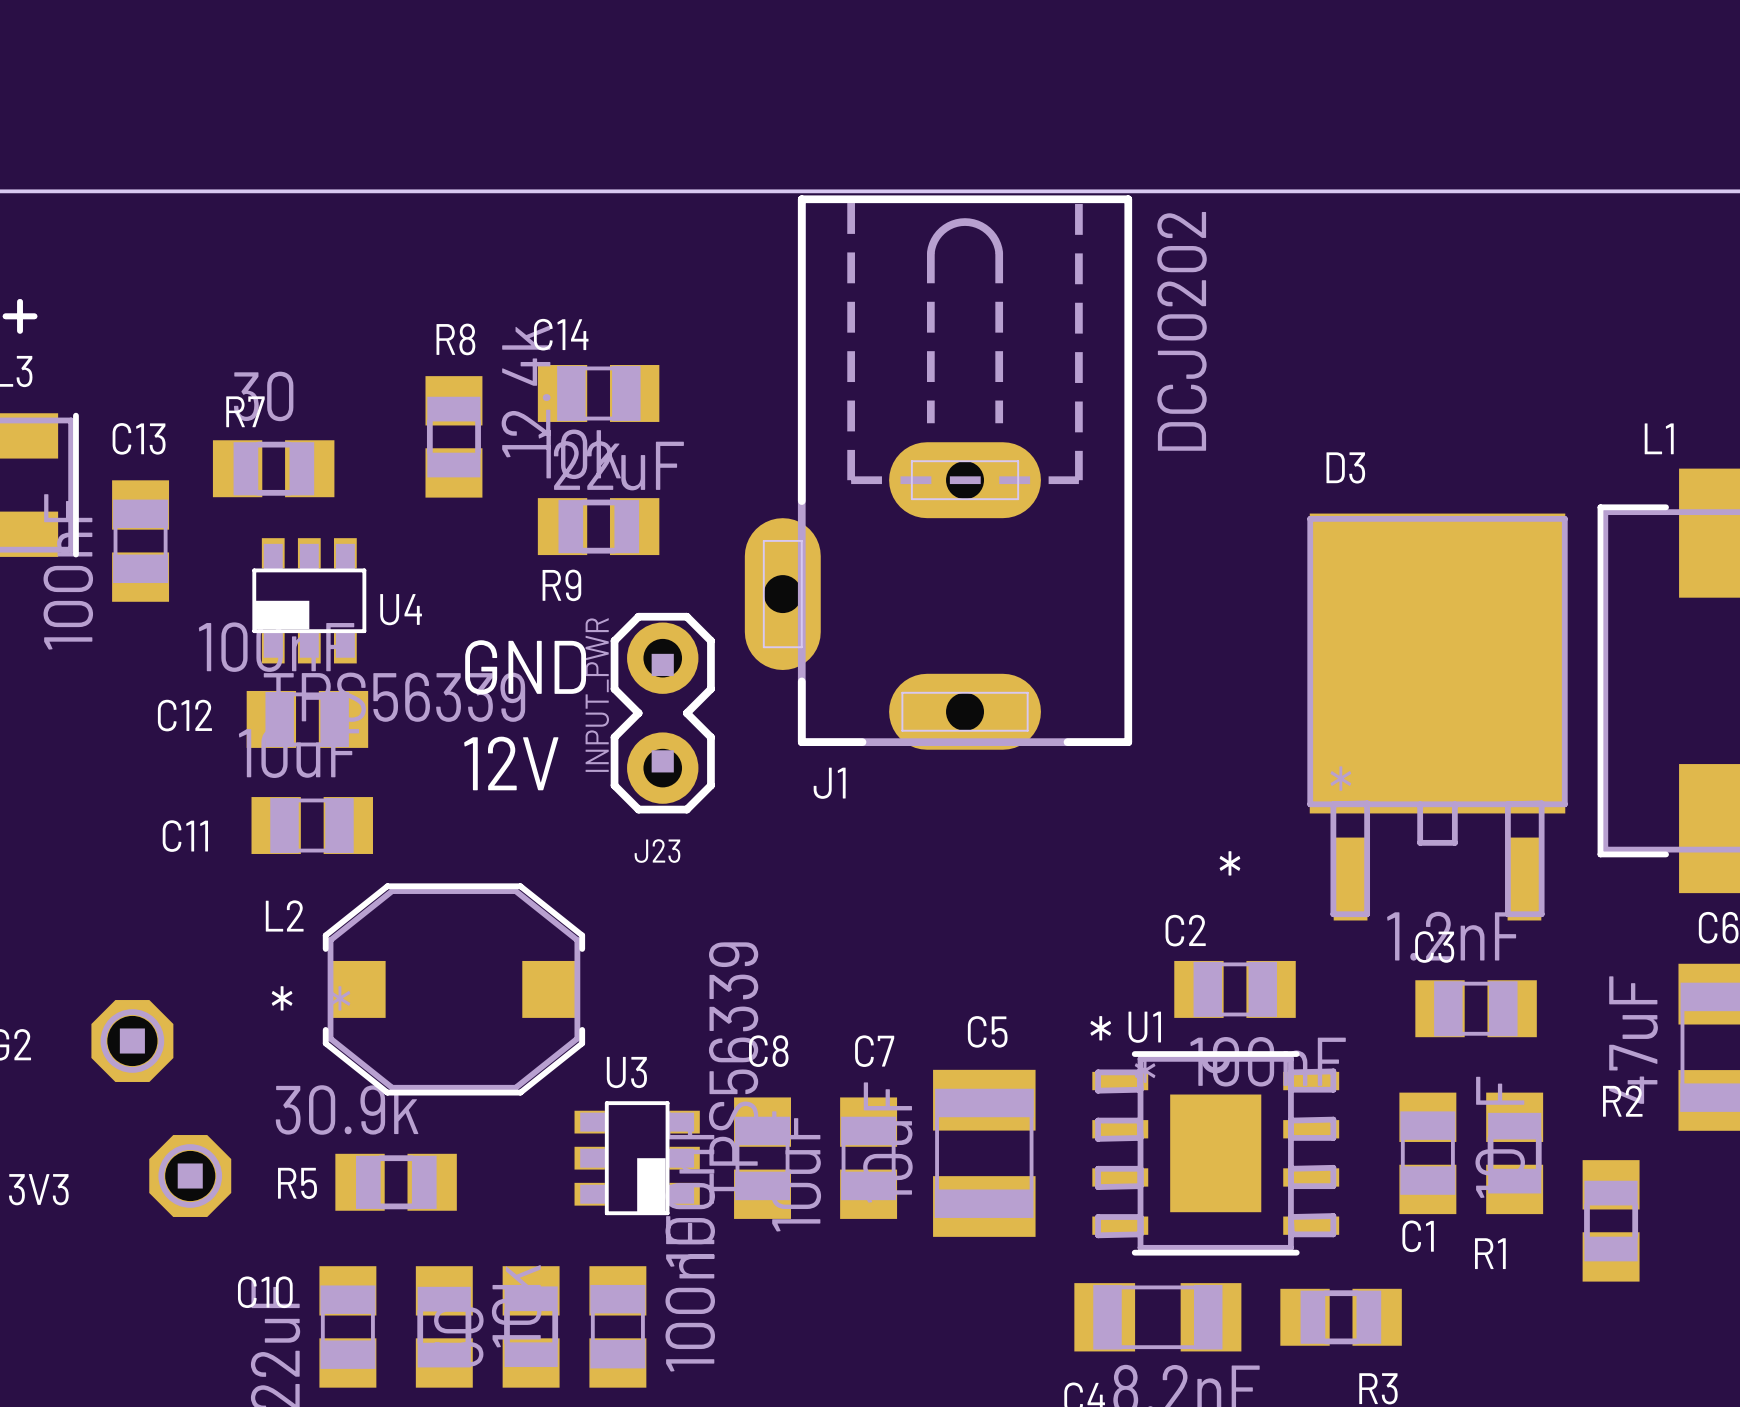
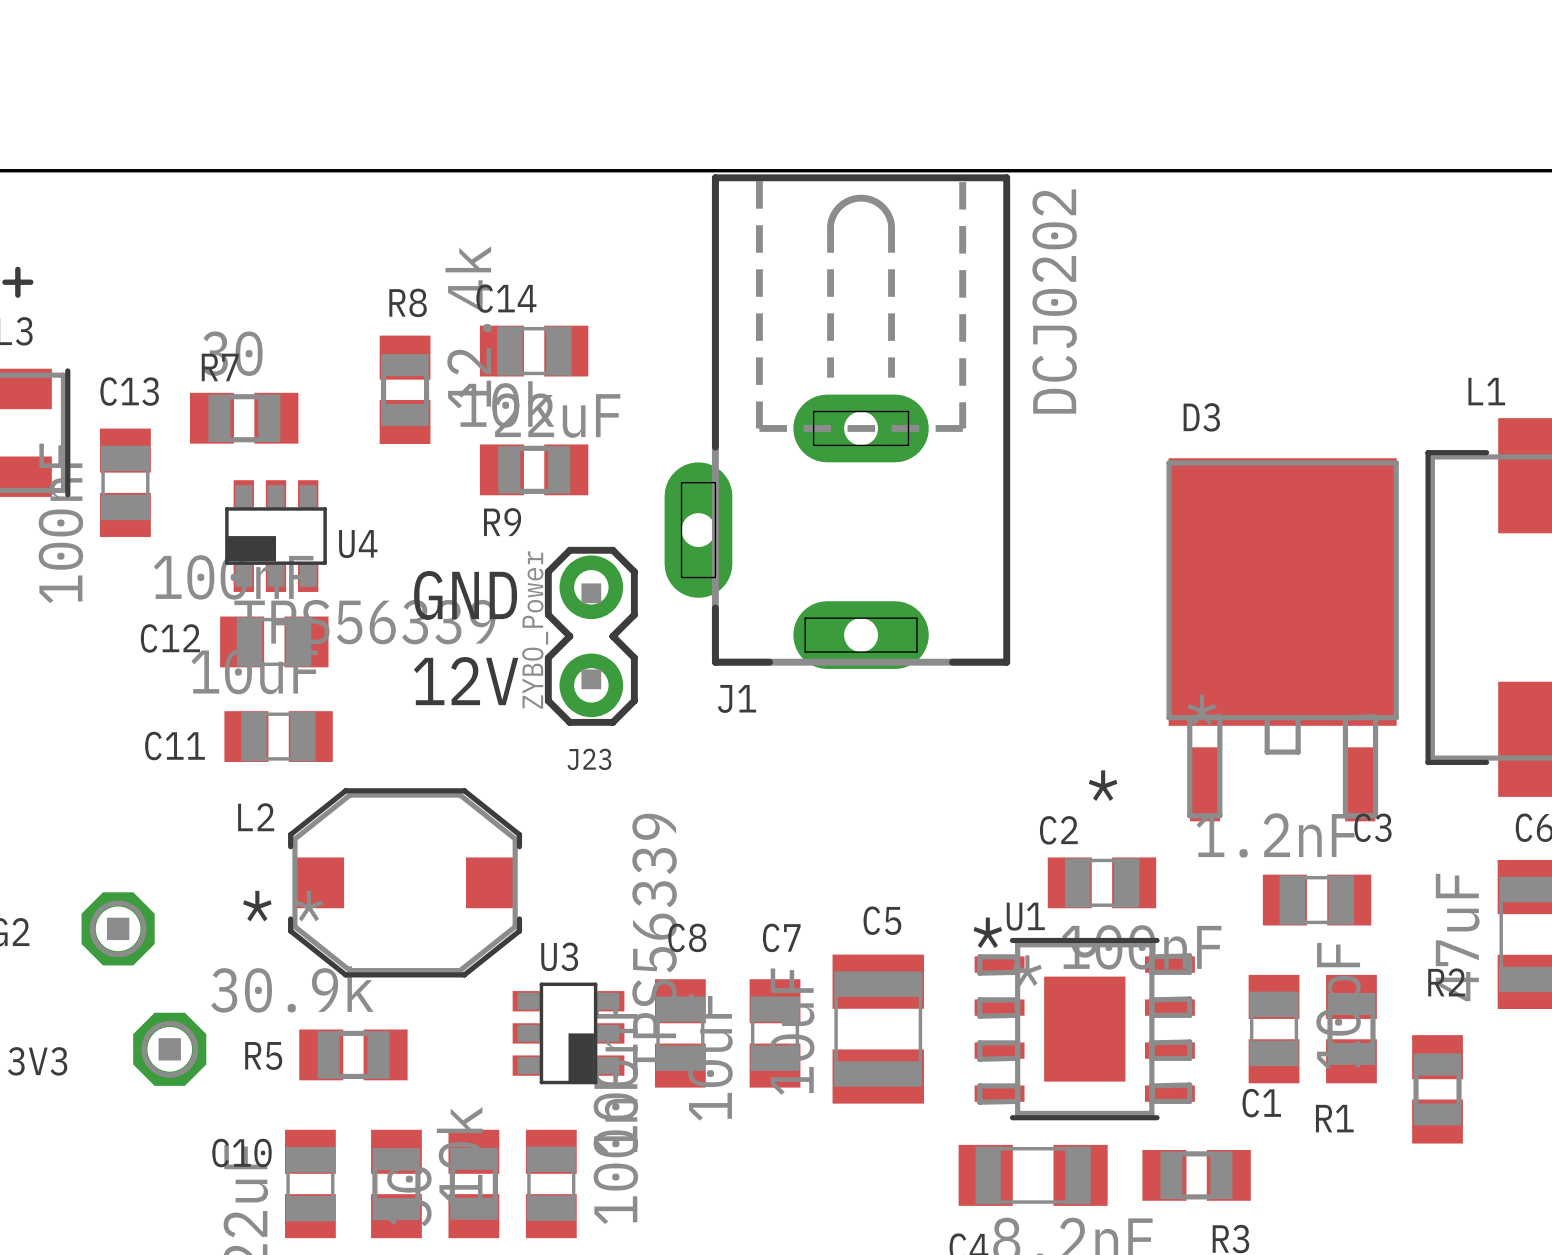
J23 value: INPUT_PWR (597, 695) -> ZYBO_Power (535, 630)
C3 name position: C3 (1434, 947) -> C3 (1372, 827)

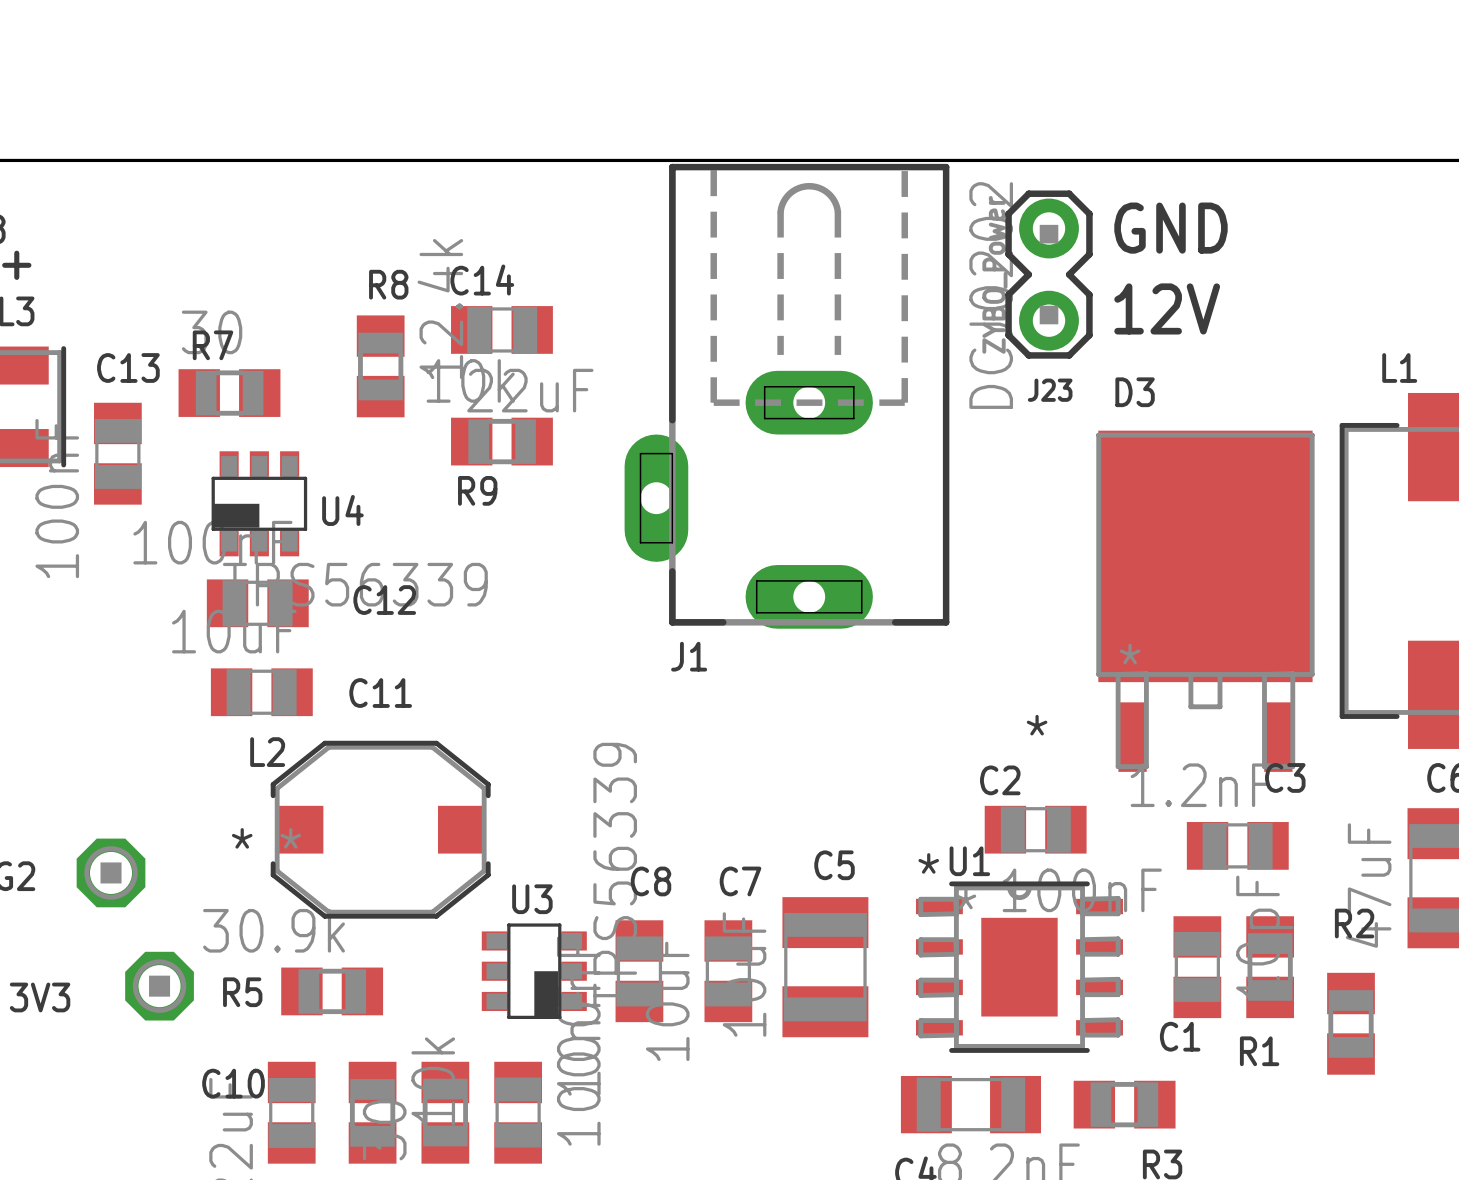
text position: GND (465, 595) -> GND (1170, 228)
J23 position: (591, 636) -> (1049, 274)
C12 name position: C12 (170, 638) -> C12 (384, 600)
text position: 12V (466, 681) -> 12V (1167, 308)
C11 name position: C11 (174, 746) -> C11 (380, 693)
L2 name position: L2 (256, 817) -> L2 (267, 752)

